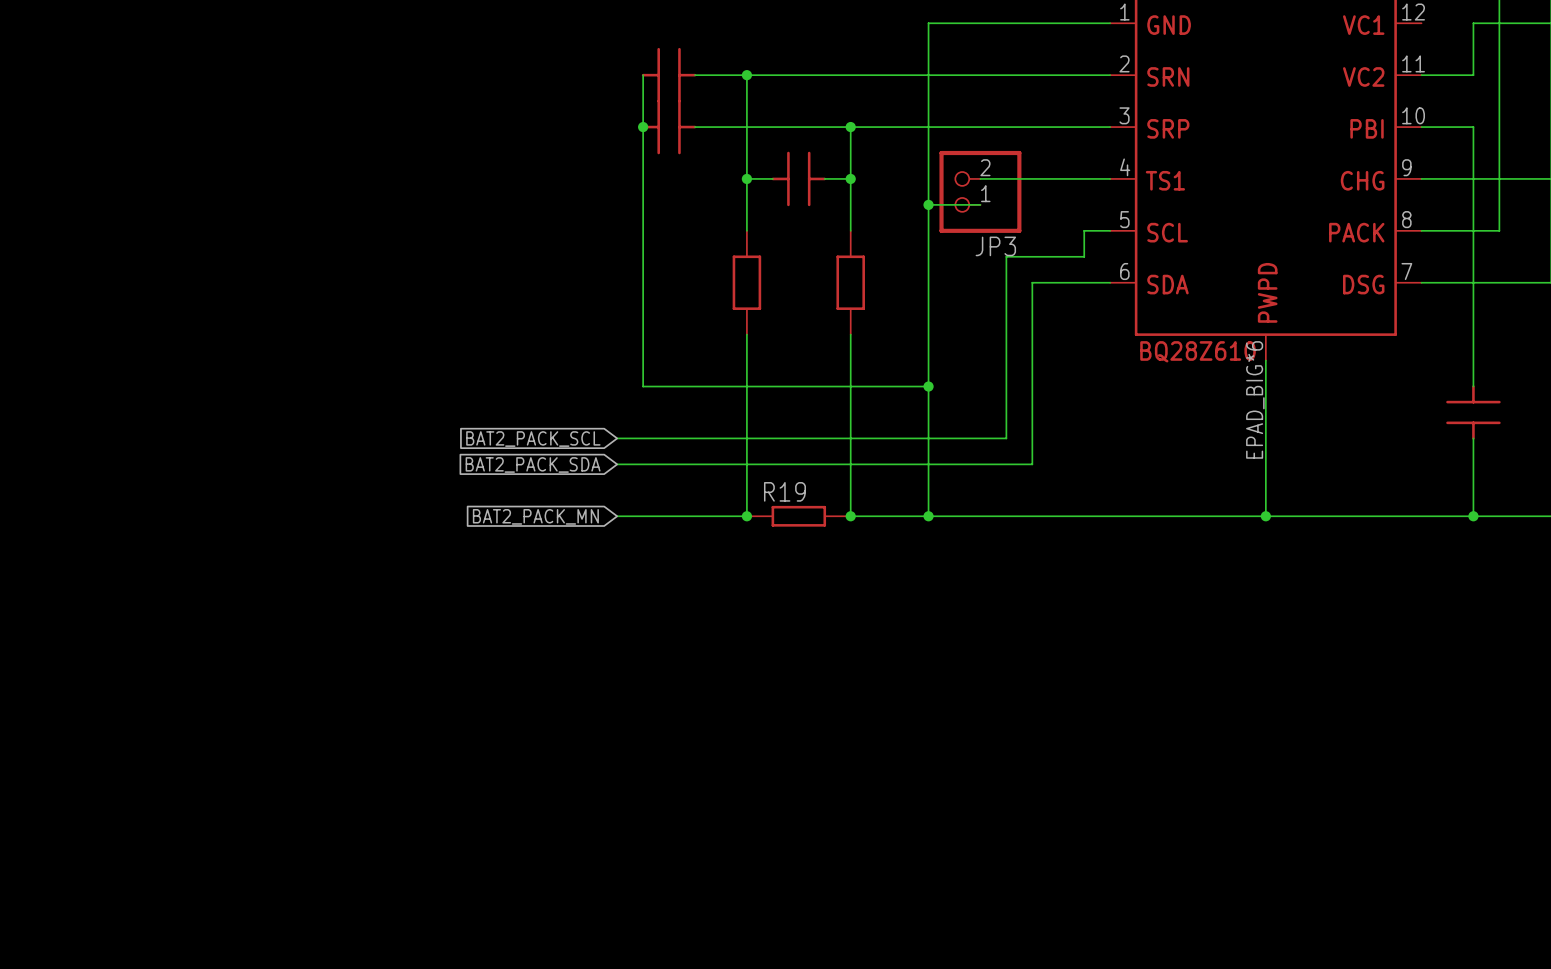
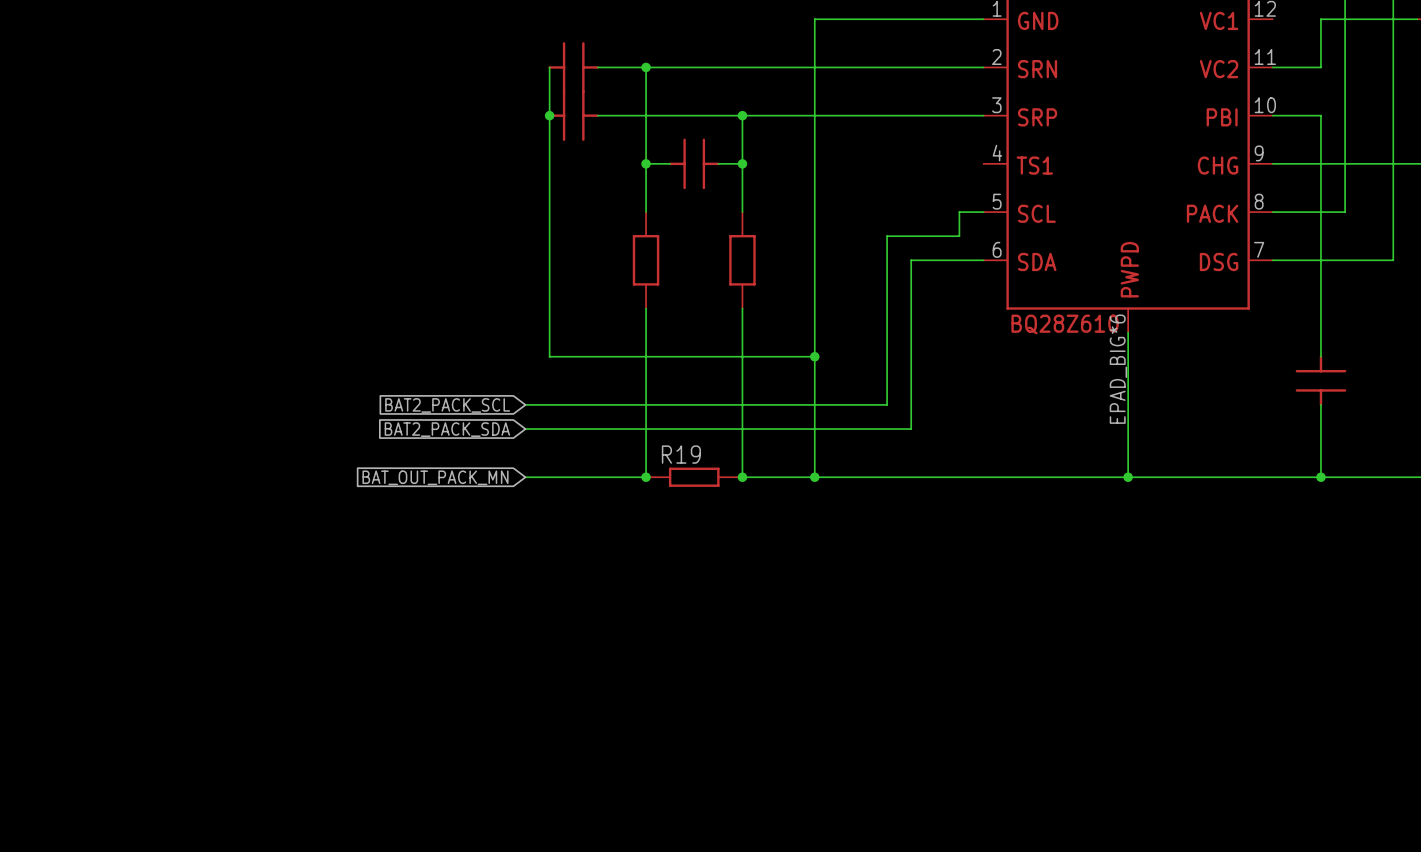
wire: (980, 178) (1110, 178) -> none
JP3: (980, 191) -> none
wire: (928, 204) (980, 204) -> none
junction: (928, 204) -> none
global label: BAT2_PACK_MN (535, 516) -> BAT_OUT_PACK_MN (435, 477)

